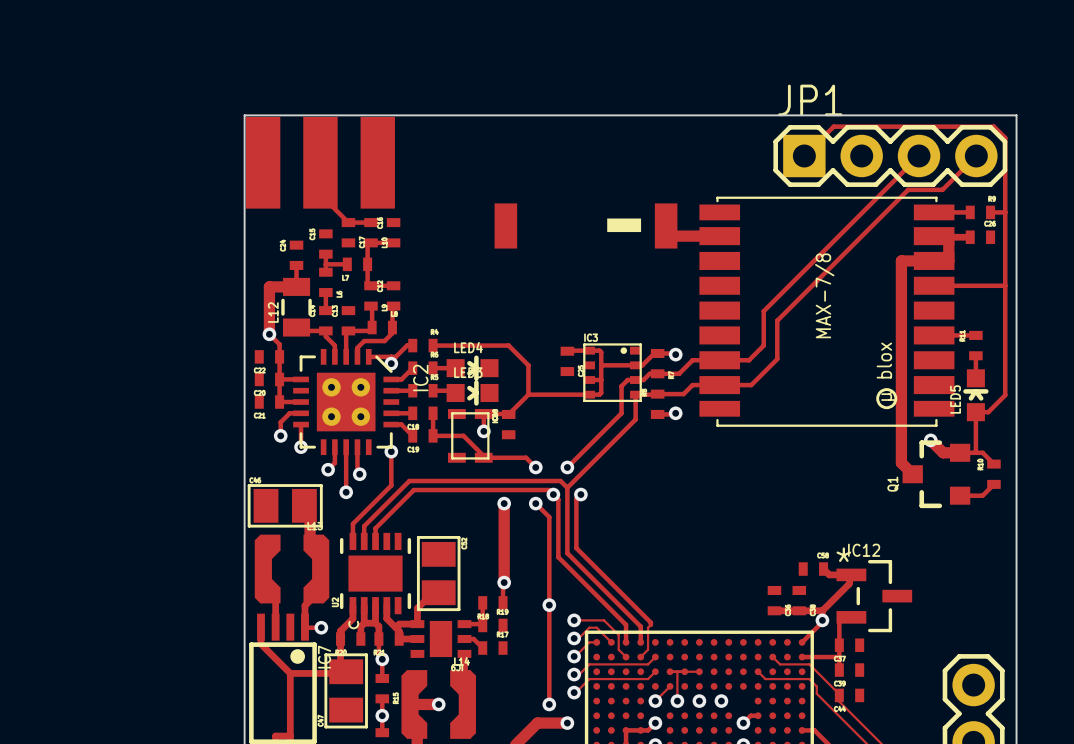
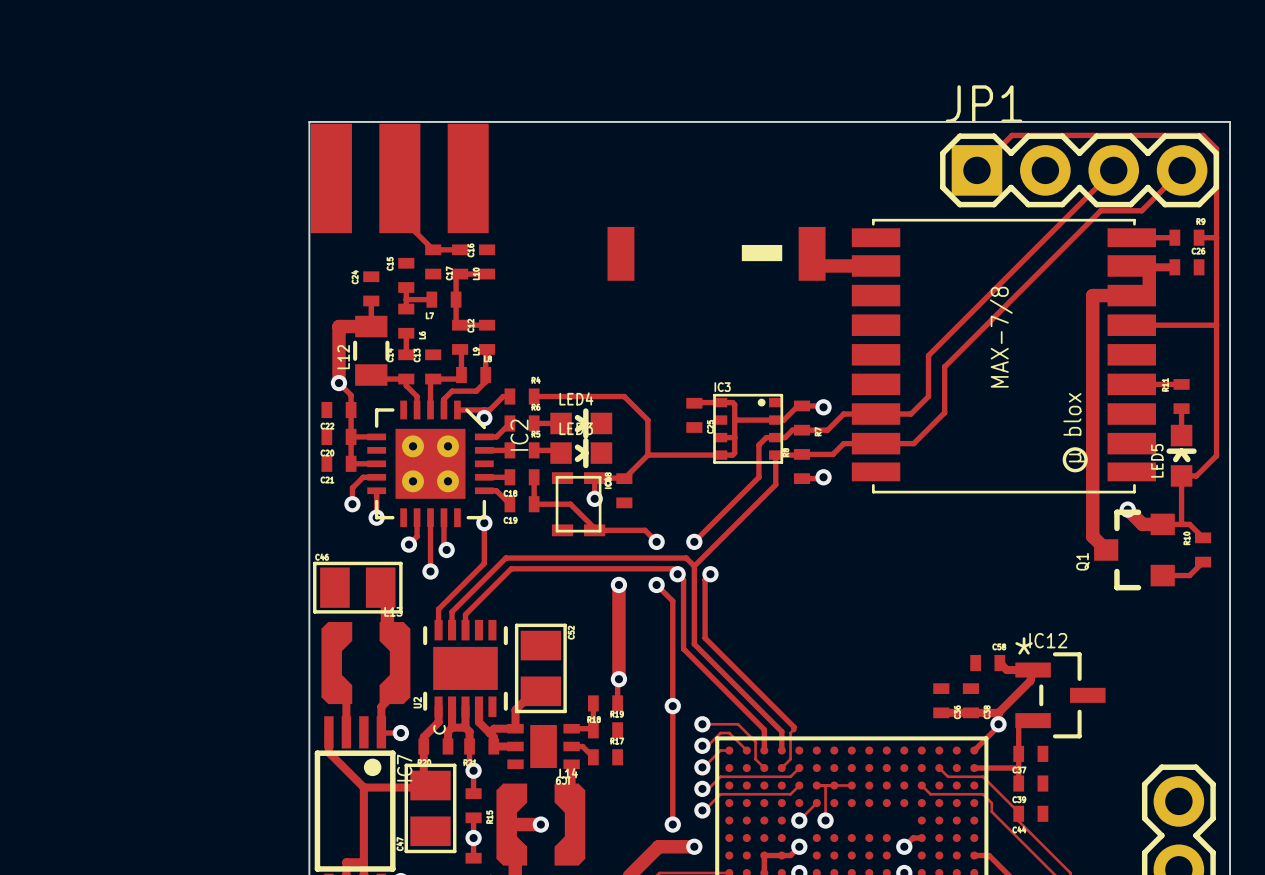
via: (699, 701) -> none
via: (721, 701) -> none

